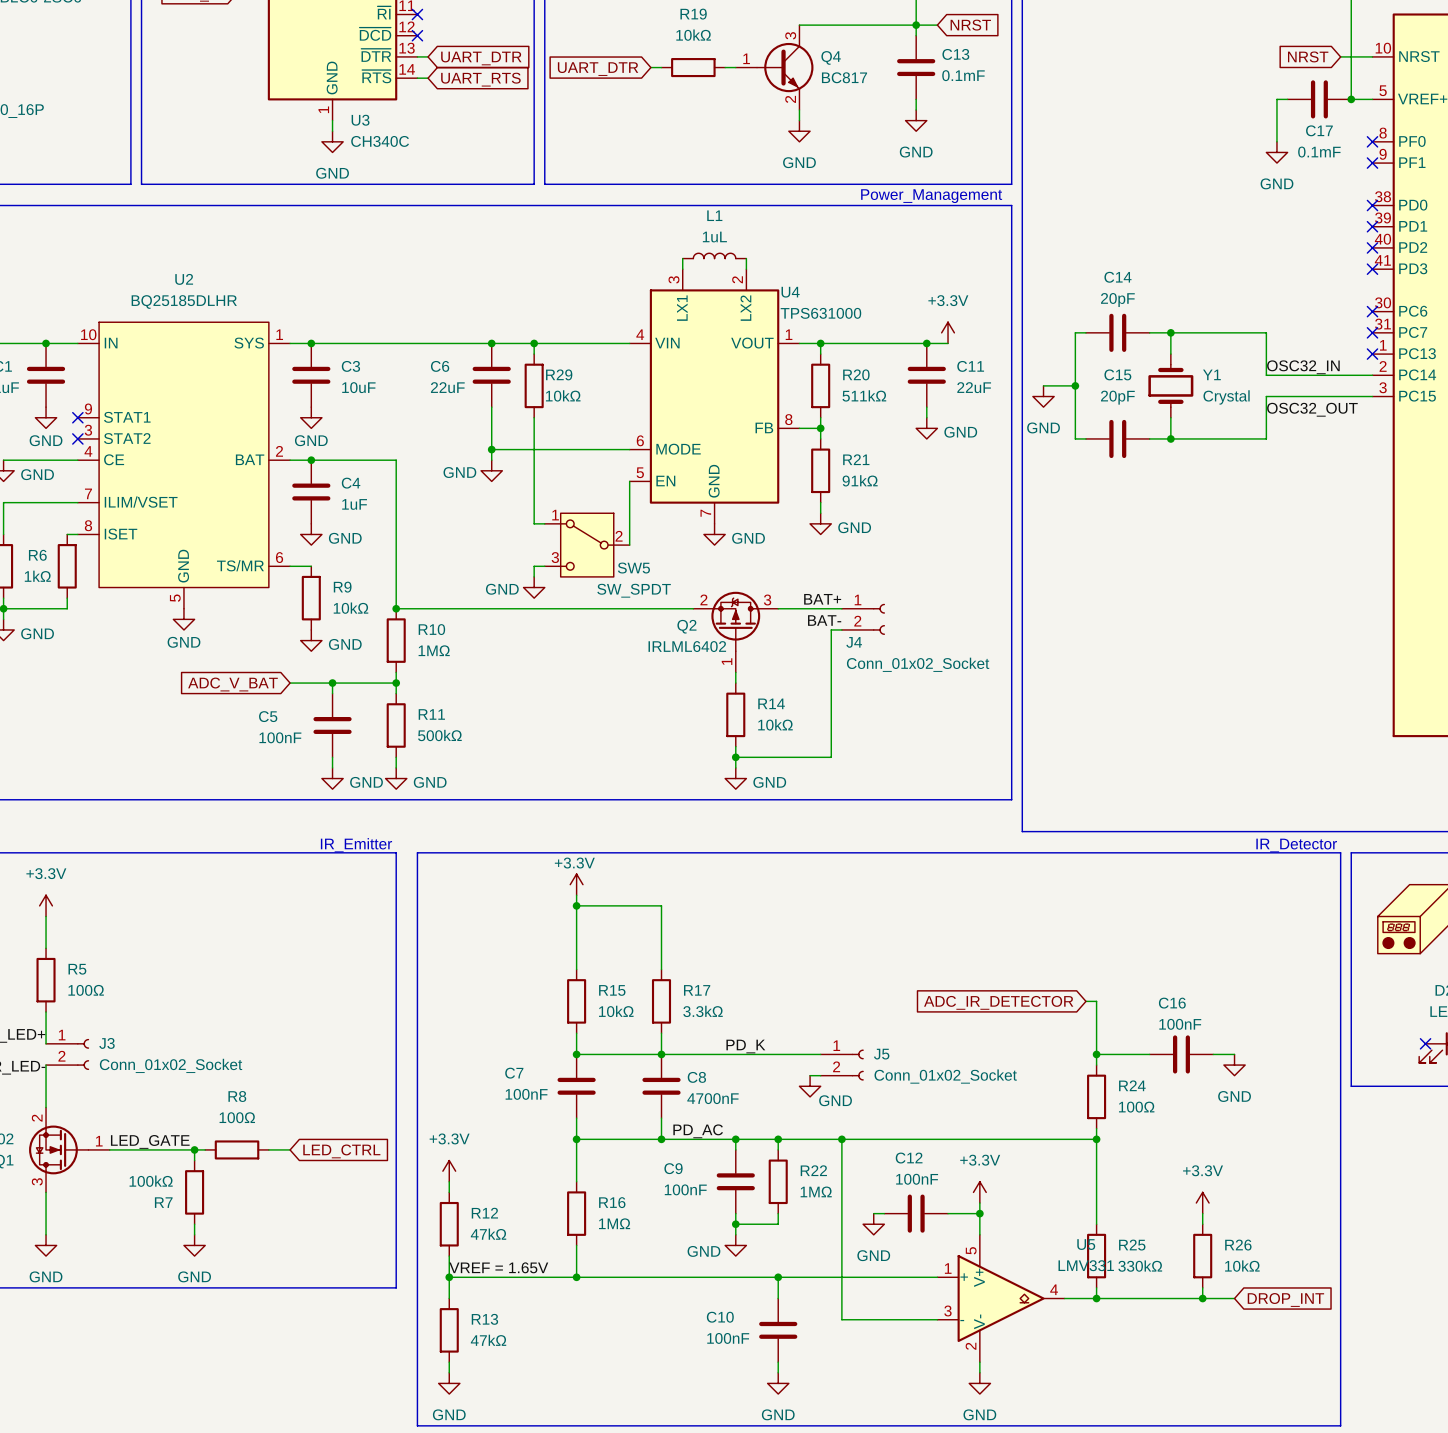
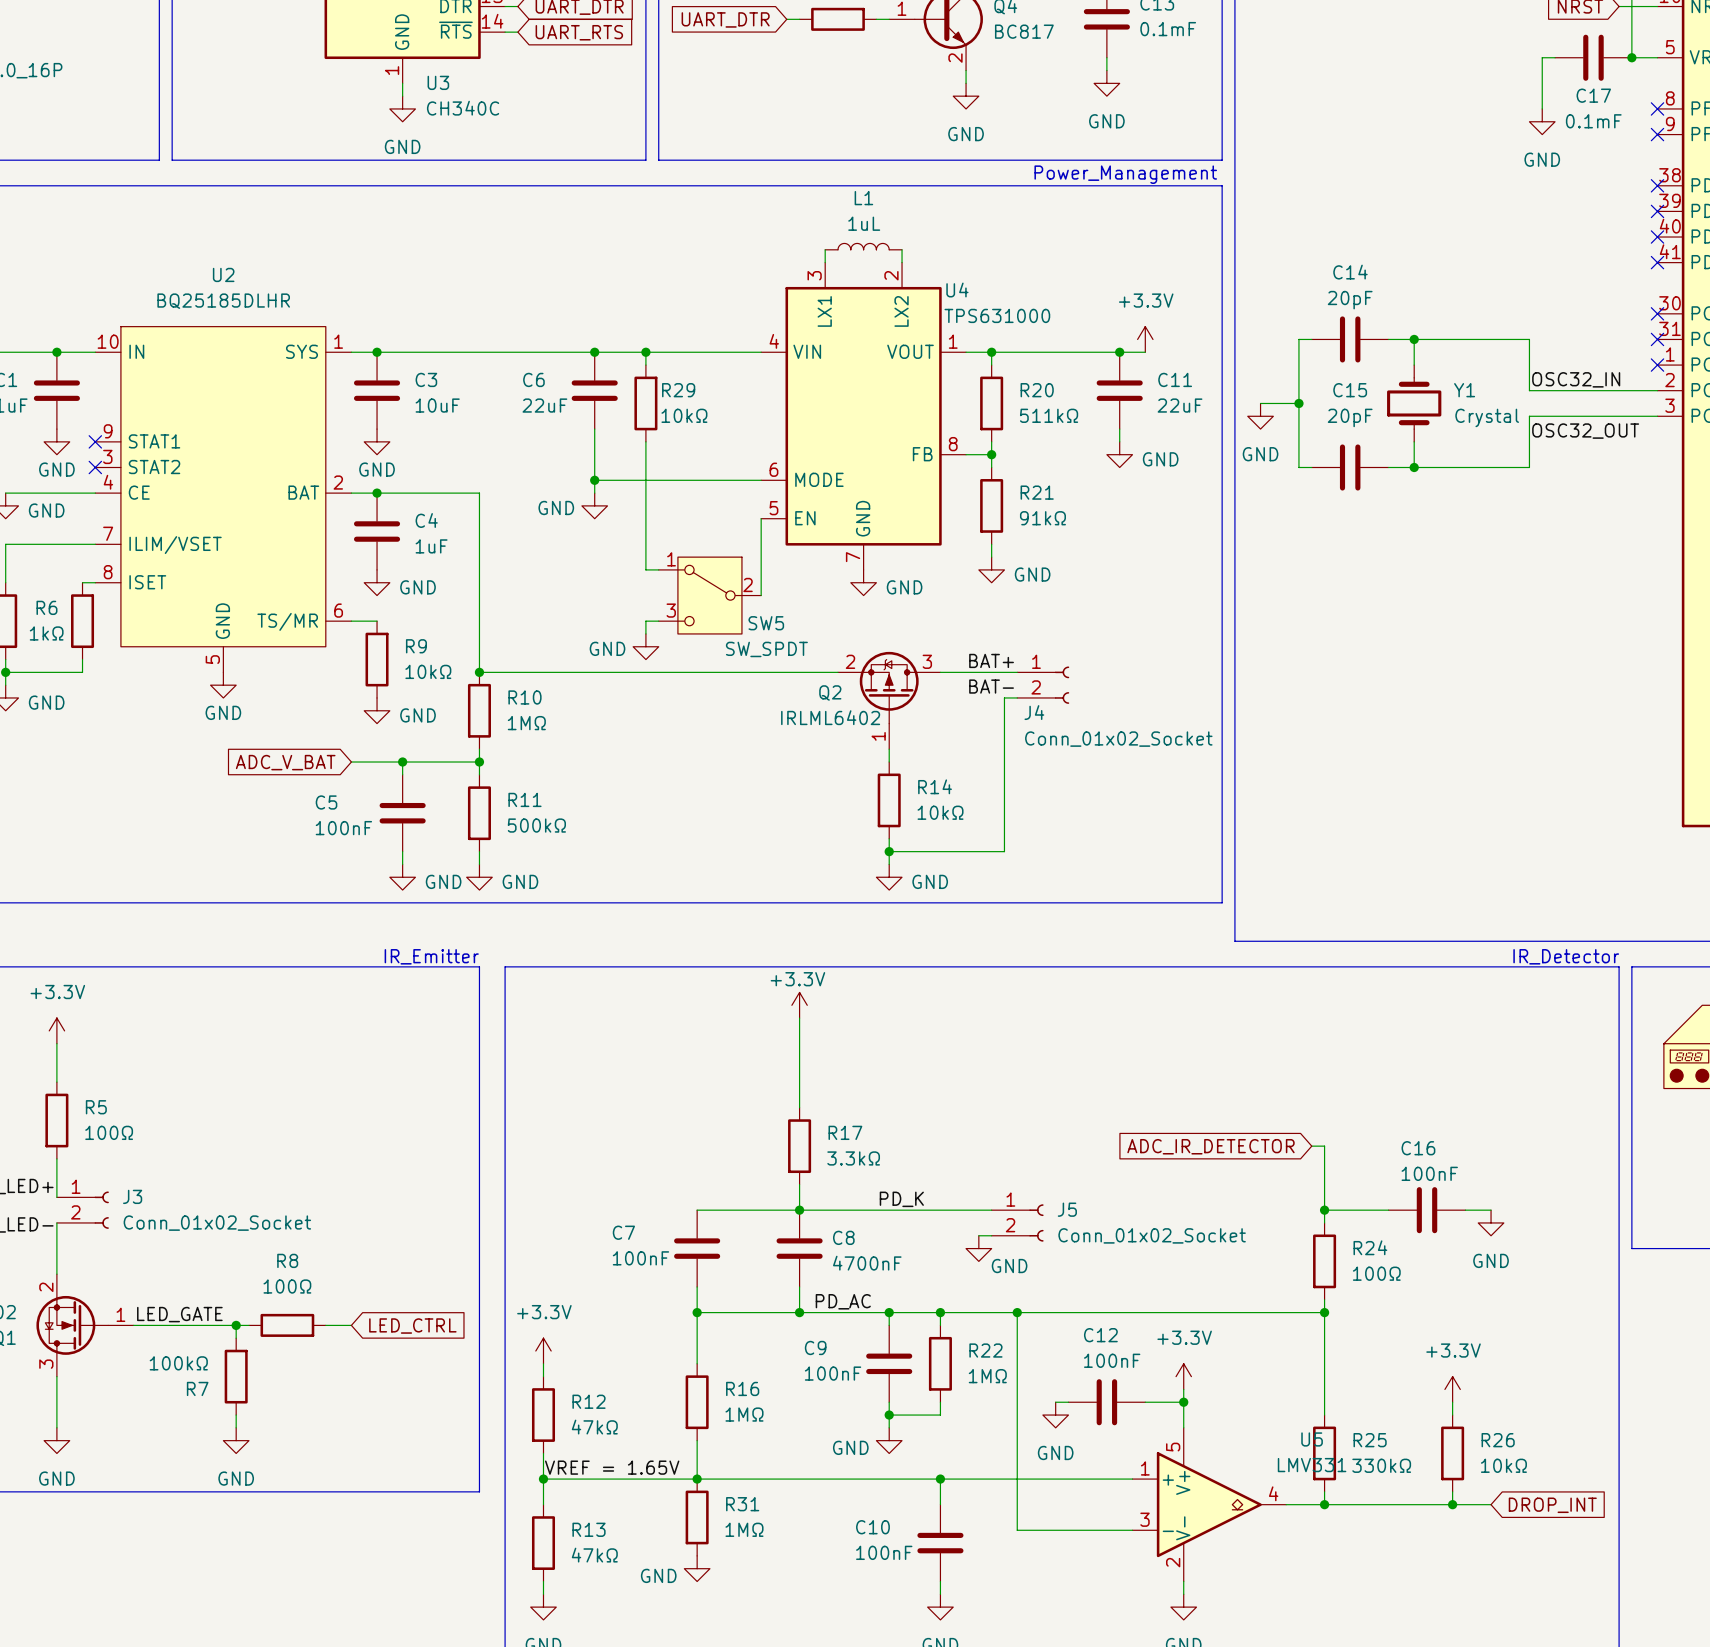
power symbol position: +3.3V (576, 884) -> +3.3V (799, 1005)
wire: (576, 895) (576, 969) -> none
wire: (576, 905) (661, 905) -> (799, 1018) (799, 1030)
junction: (576, 905) -> none
R15: 10kΩ (576, 1001) -> none
wire: (576, 1033) (576, 1054) -> none
junction: (576, 1054) -> none
R31: none -> 1MΩ (697, 1517)
power symbol: none -> GND (697, 1568)

